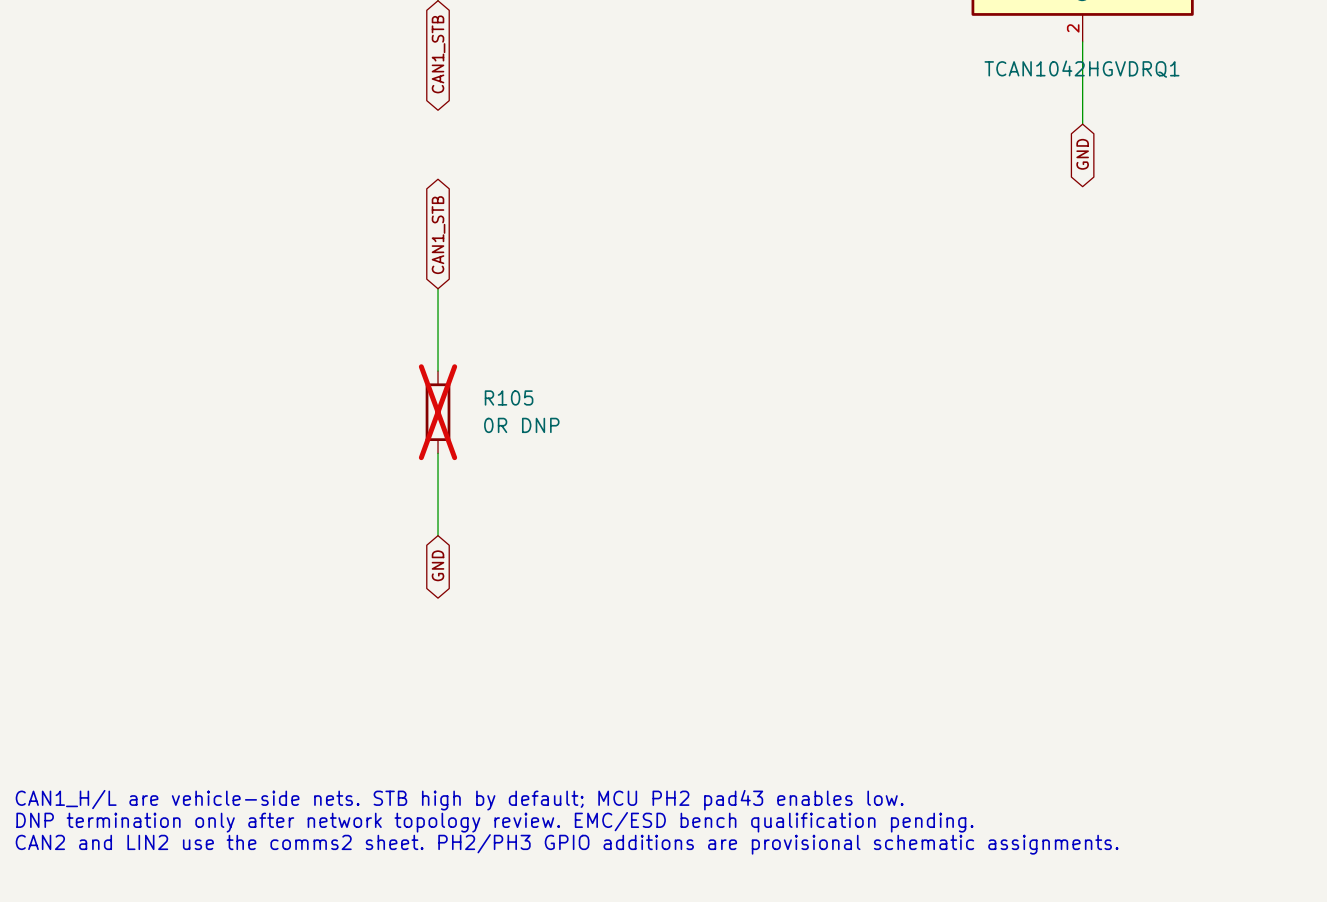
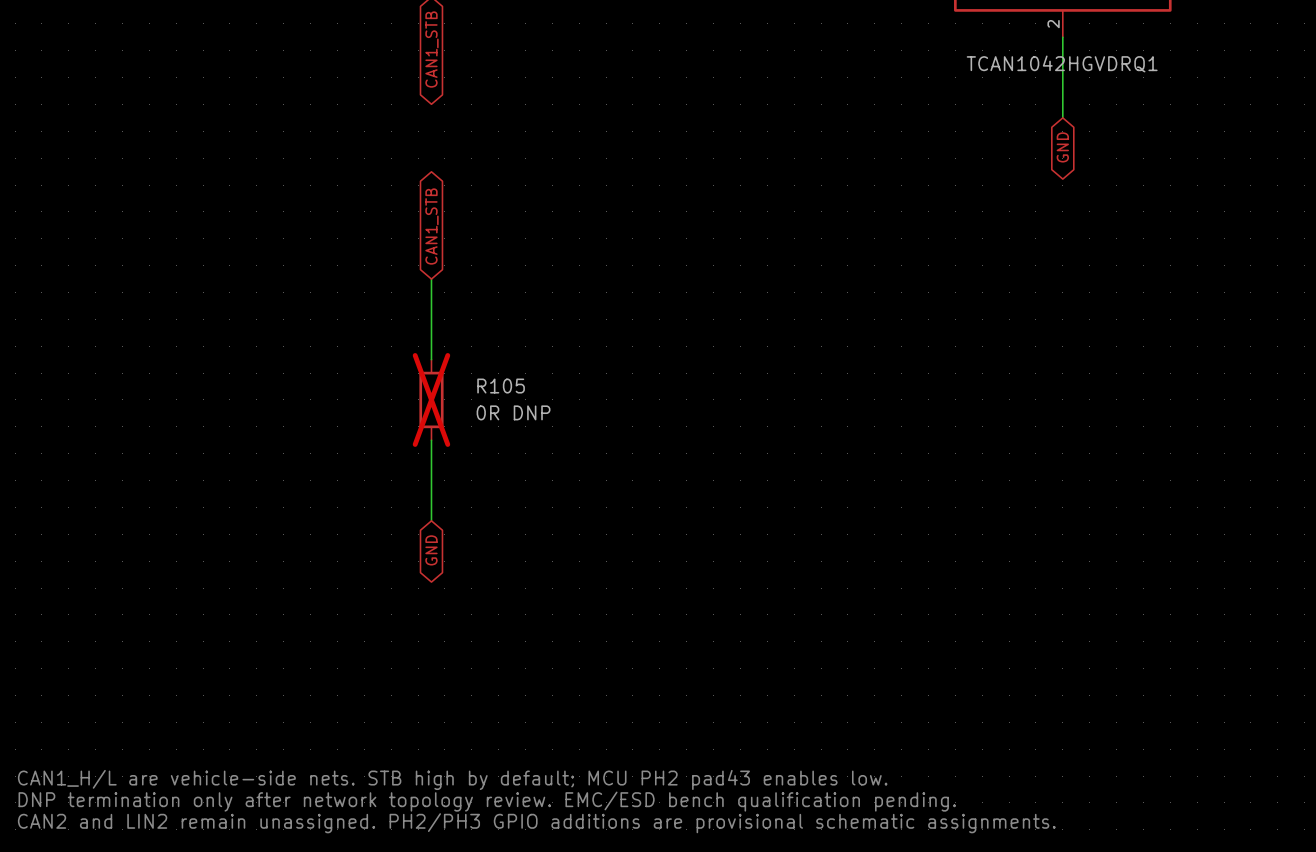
text: CAN2 and LIN2 use the comms2 sheet. PH2/PH3 GPIO additions are provisional schematic assignments. (567, 844) -> CAN2 and LIN2 remain unassigned. PH2/PH3 GPIO additions are provisional schematic assignments. (536, 823)

